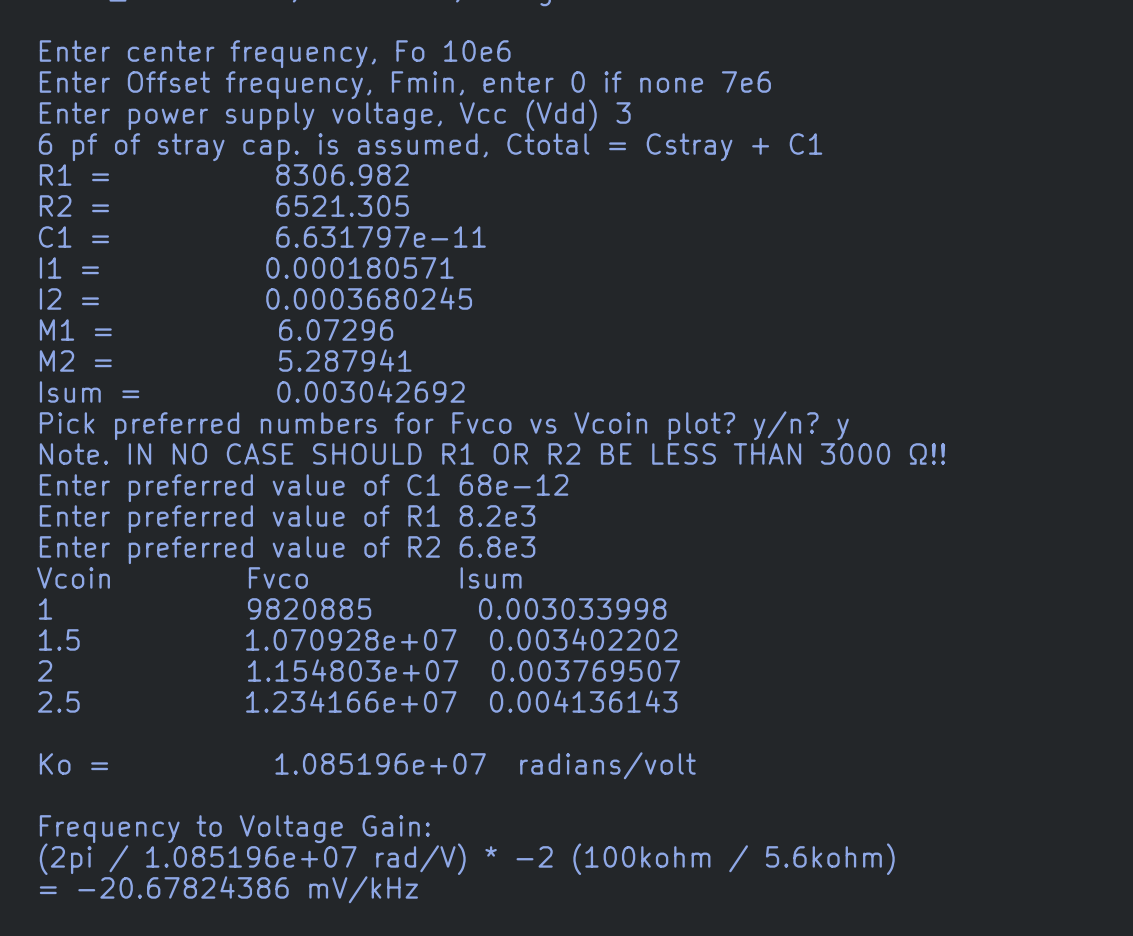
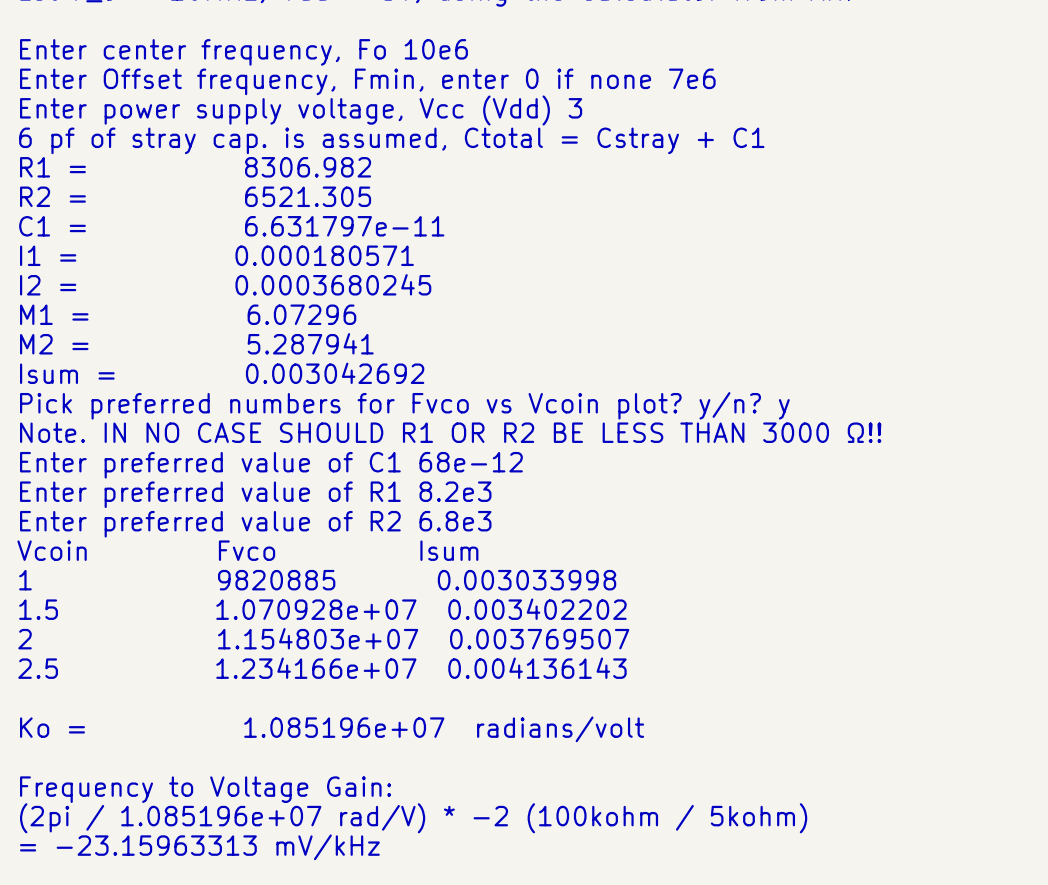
text: (2pi / 1.085196e+07 rad/V) * -2 (100kohm / 5.6kohm) (467, 859) -> (2pi / 1.085196e+07 rad/V) * -2 (100kohm / 5kohm) (413, 818)
text: = -20.67824386 mV/kHz (228, 889) -> = -23.15963313 mV/kHz (199, 847)

